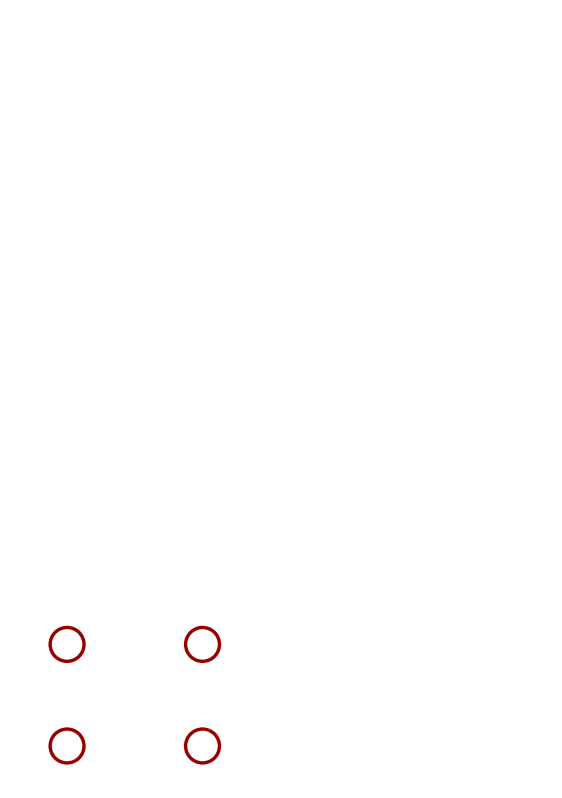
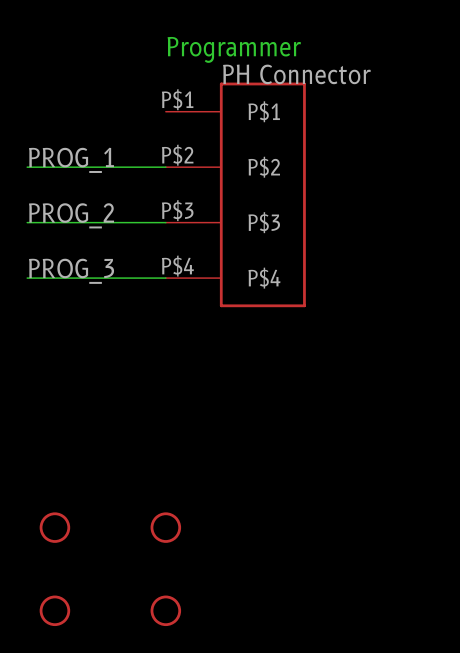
text: none -> Programmer (234, 49)
label: none -> PROG_1 (71, 160)
wire: none -> (27, 167) (165, 167)
part: none -> (235, 194)
label: none -> PROG_2 (71, 215)
wire: none -> (27, 222) (165, 222)
label: none -> PROG_3 (71, 271)
wire: none -> (27, 278) (165, 278)

